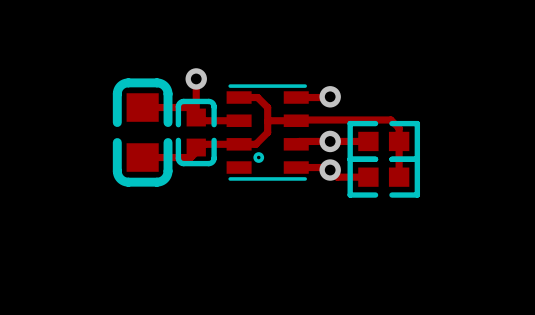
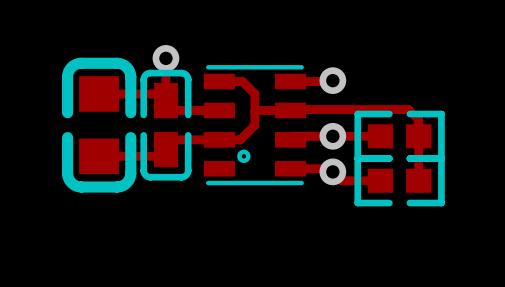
part footprint: [175, 98, 217, 167] -> [140, 69, 192, 181]

